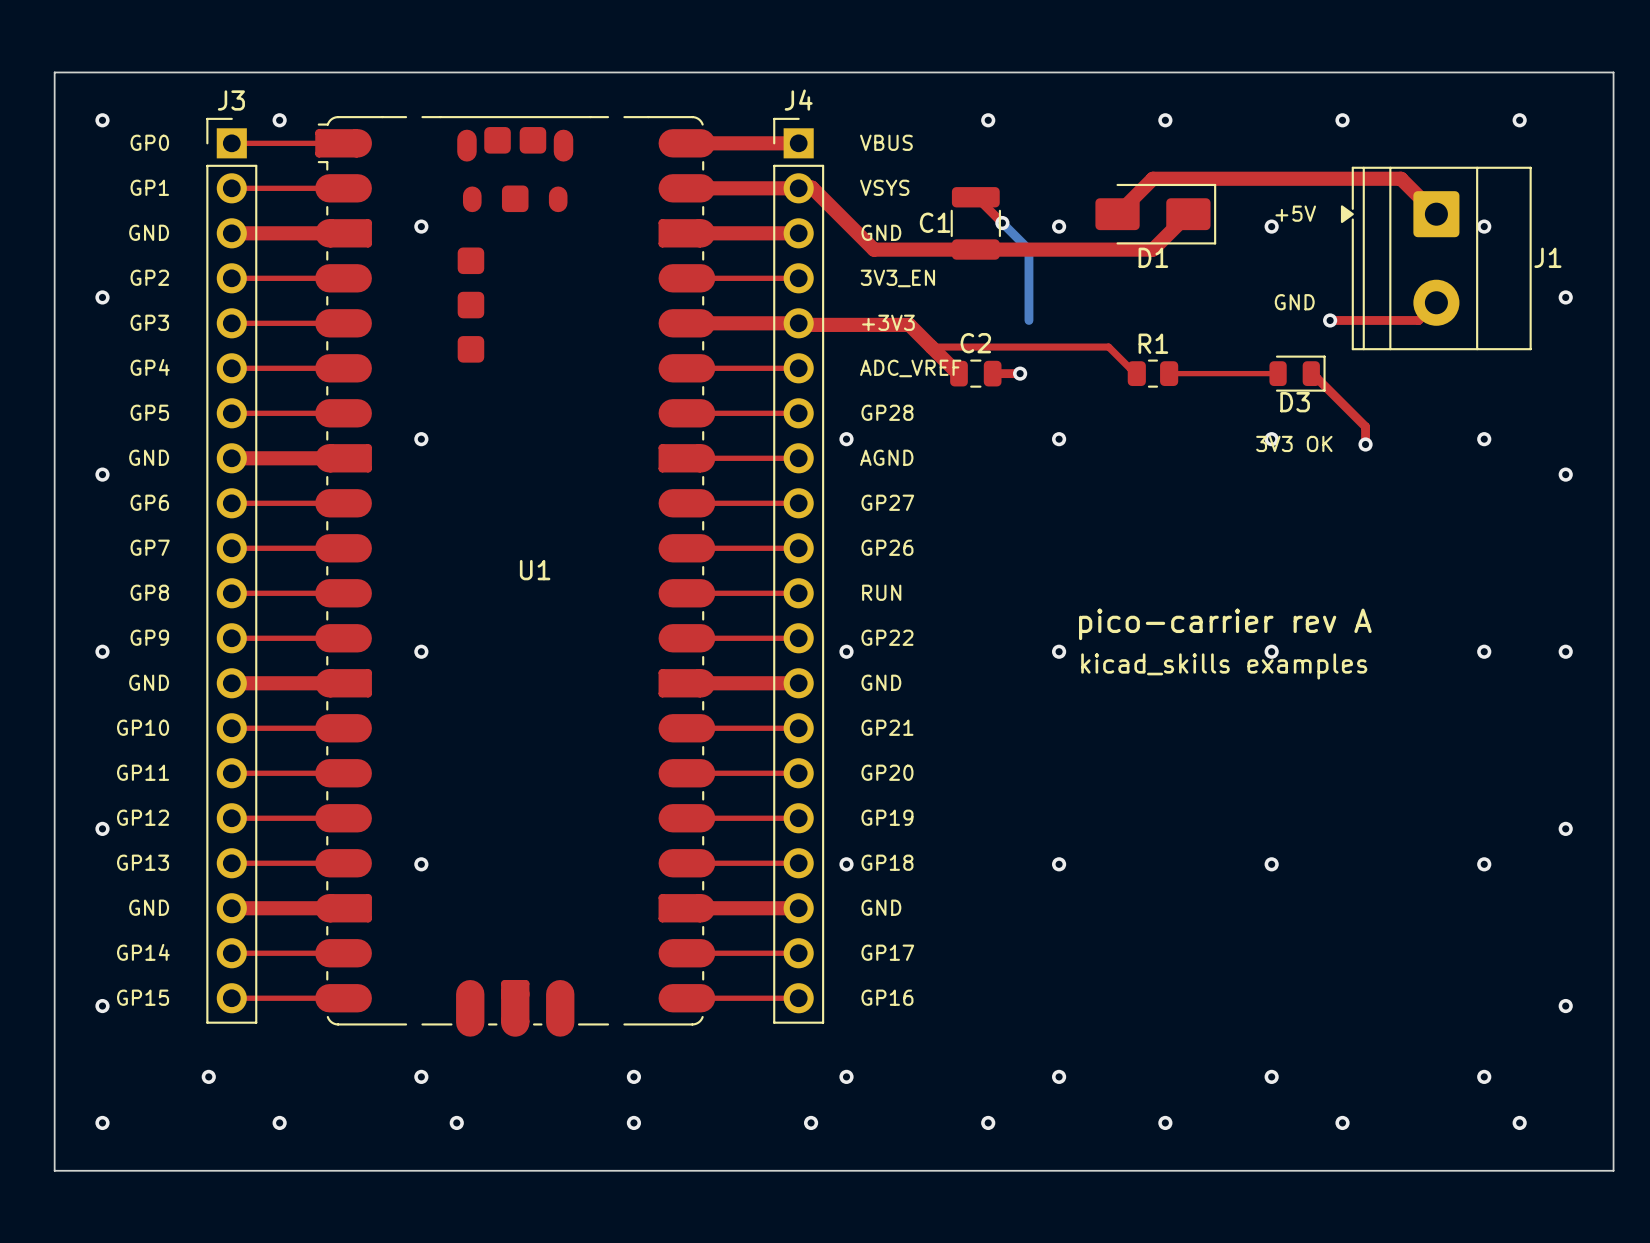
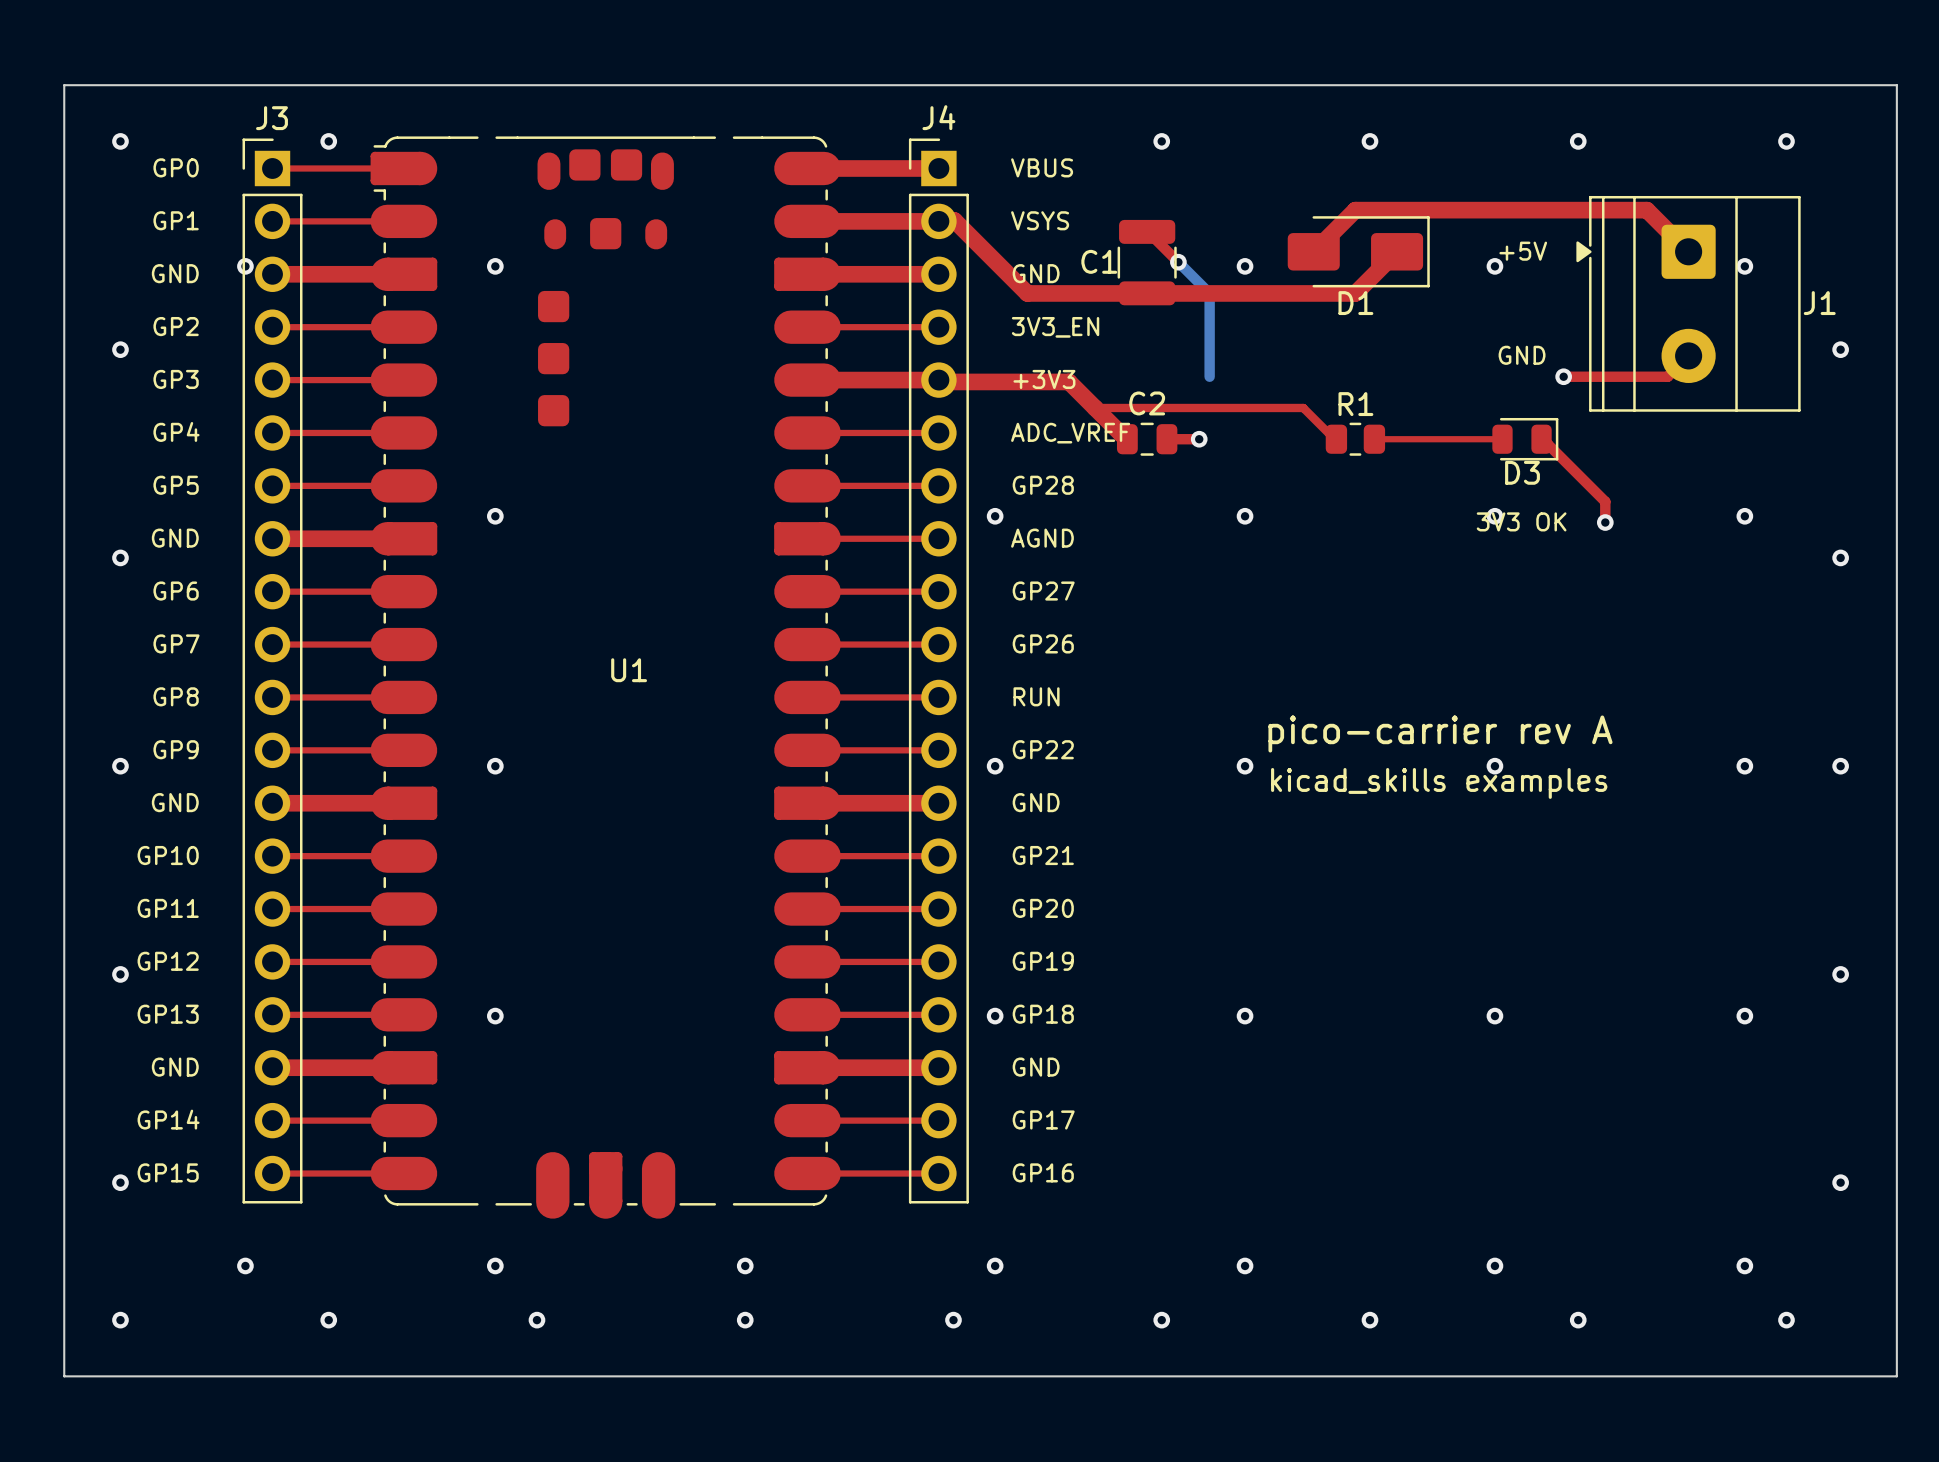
via: none -> (245, 266)

